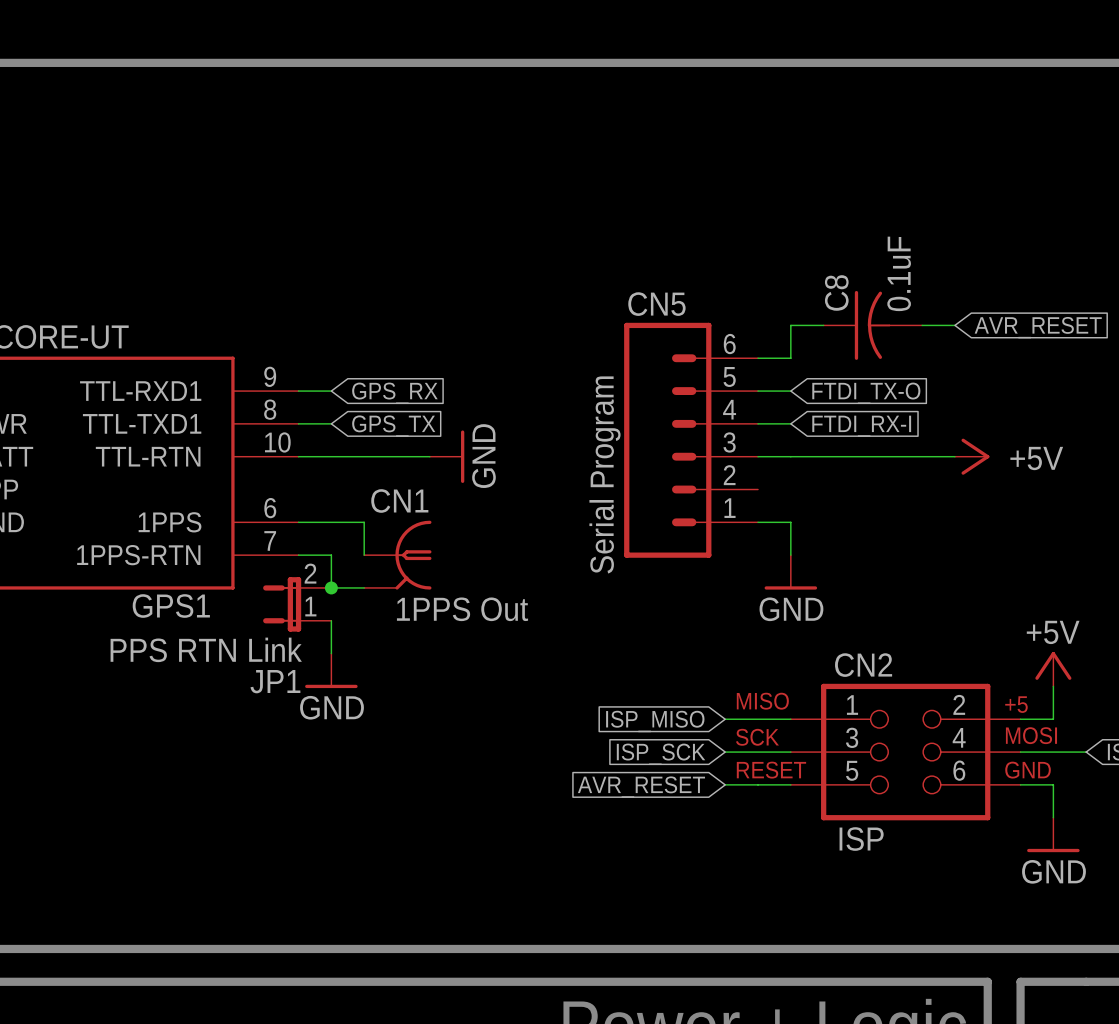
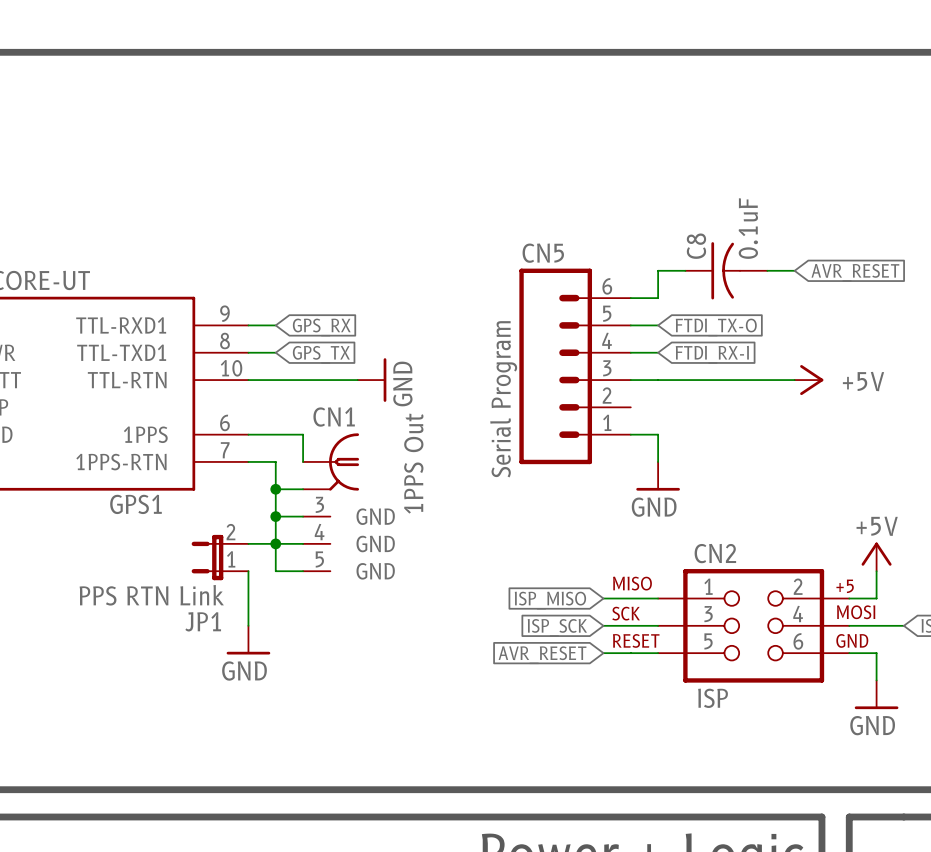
wire: none -> (275, 489) (275, 516) (303, 516)
JP1 position: (297, 604) -> (220, 557)
CN1 value rotation: 0° (462, 609) -> 90° counterclockwise (413, 463)
junction: none -> (275, 516)
part: none -> (316, 516)
wire: none -> (248, 543) (303, 543)
junction: none -> (275, 543)
part: none -> (316, 543)
power symbol position: GND (331, 670) -> GND (248, 640)
wire: none -> (248, 571) (248, 625)
part: none -> (316, 571)

